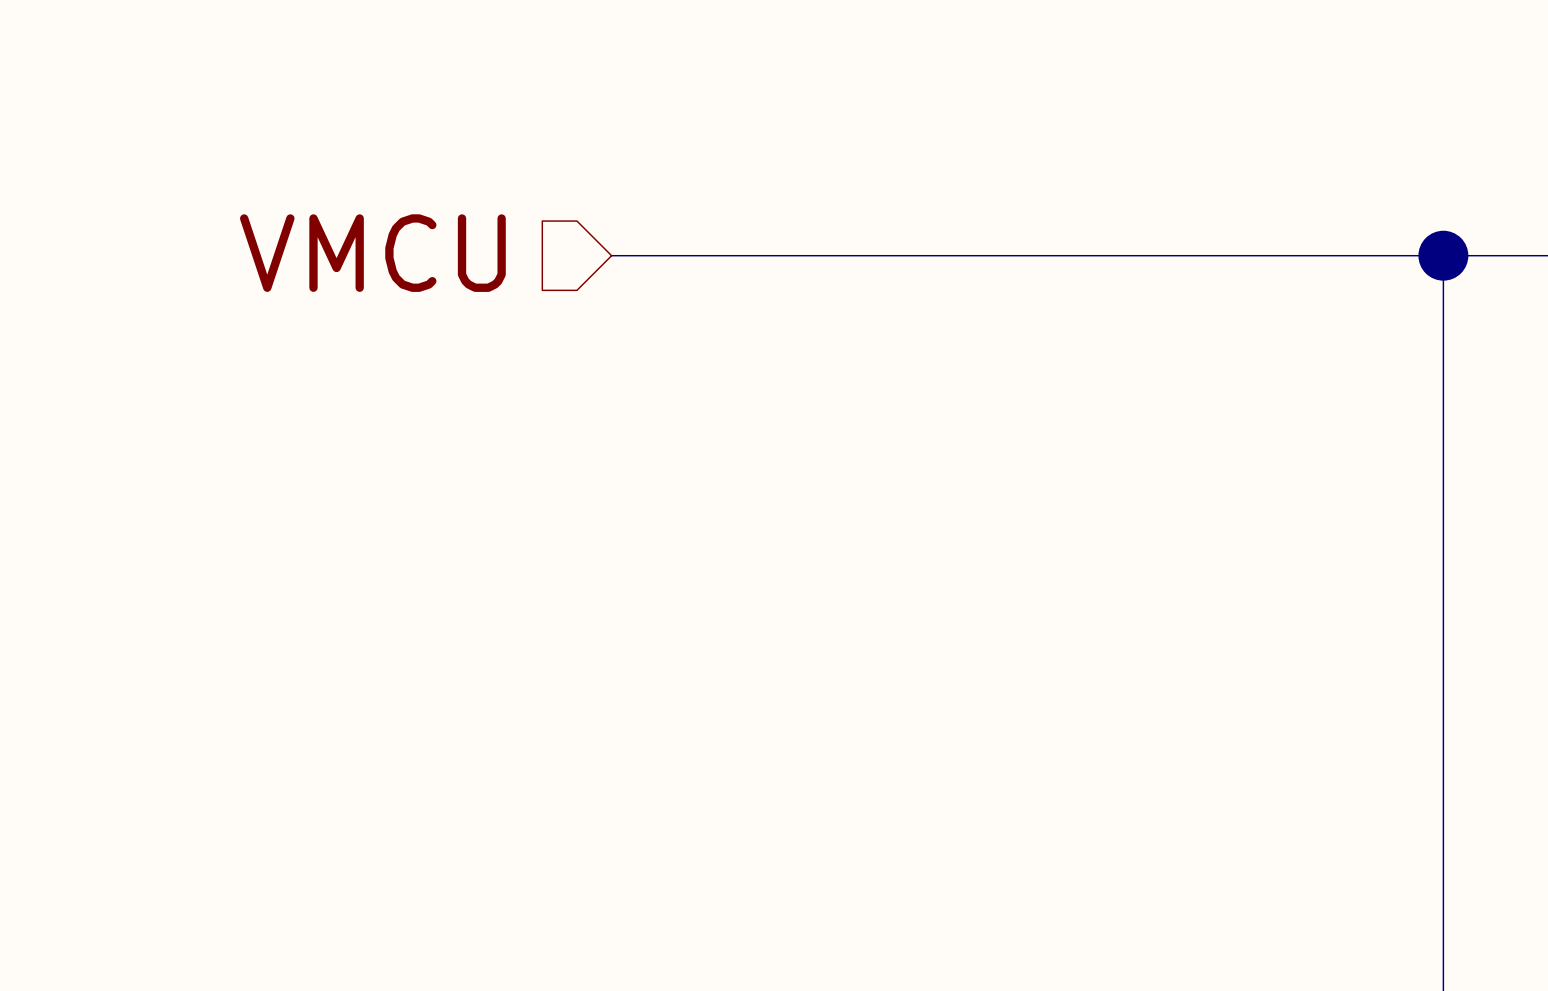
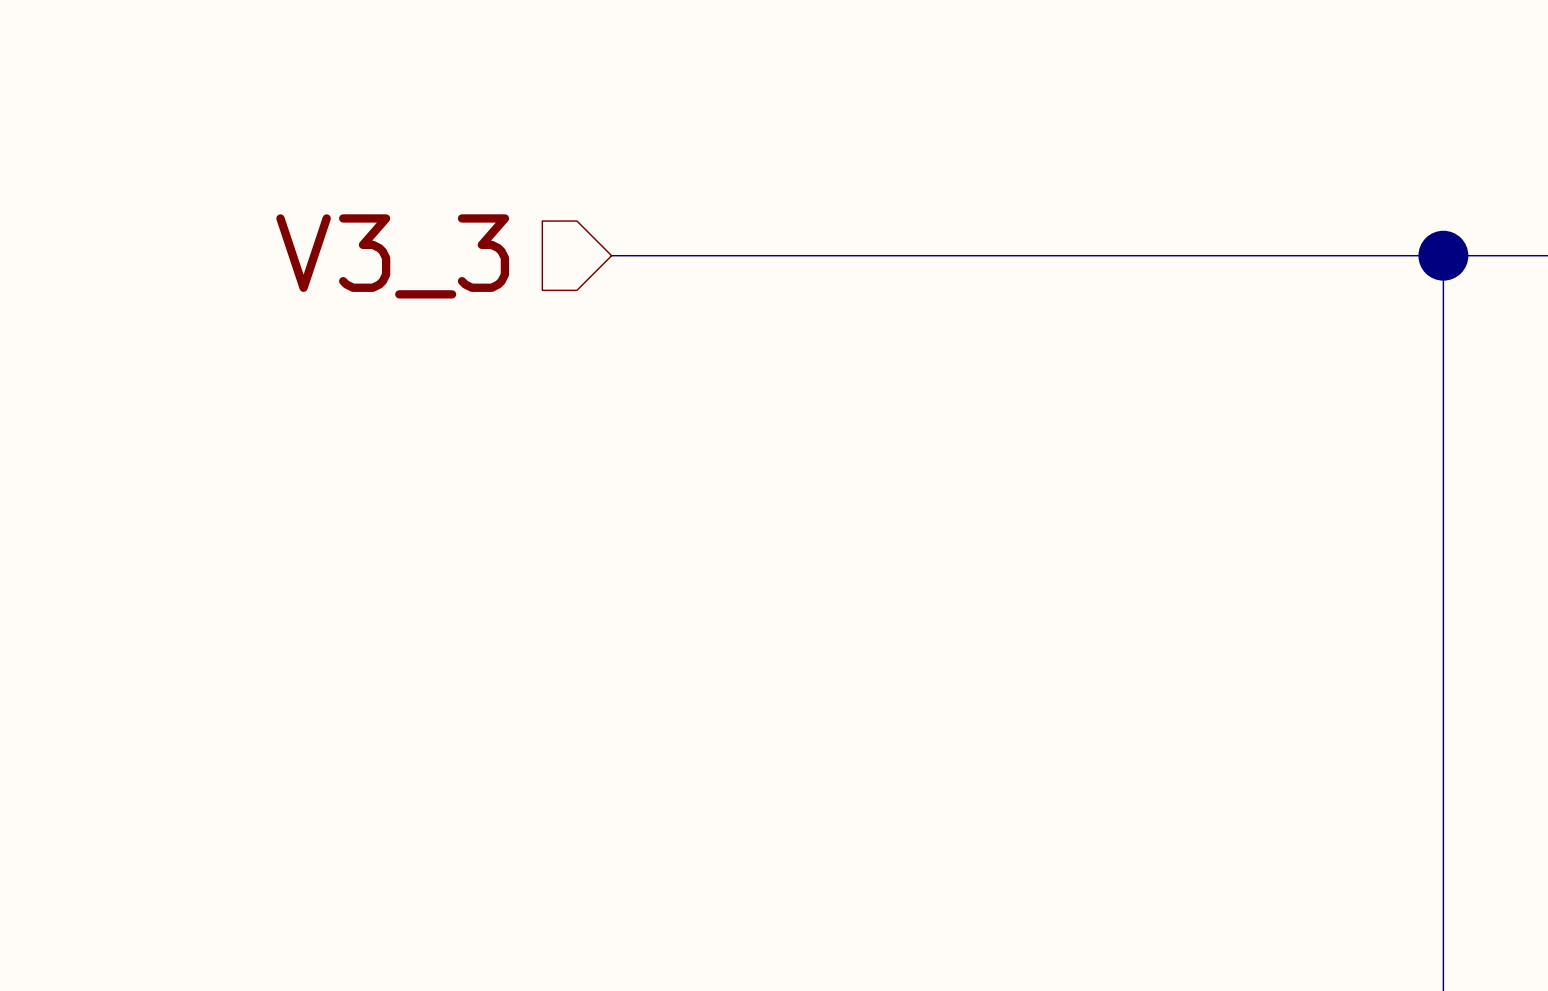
hierarchical label: VMCU (372, 253) -> V3_3 (392, 256)

